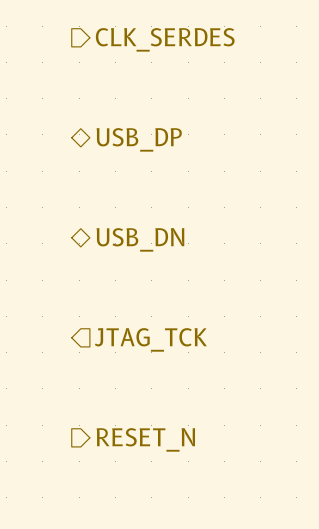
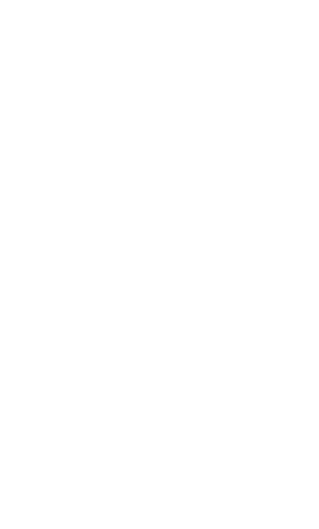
hierarchical label: CLK_SERDES (165, 39) -> none
hierarchical label: USB_DP (139, 139) -> none
hierarchical label: USB_DN (140, 239) -> none
hierarchical label: JTAG_TCK (150, 339) -> none
hierarchical label: RESET_N (145, 439) -> none

